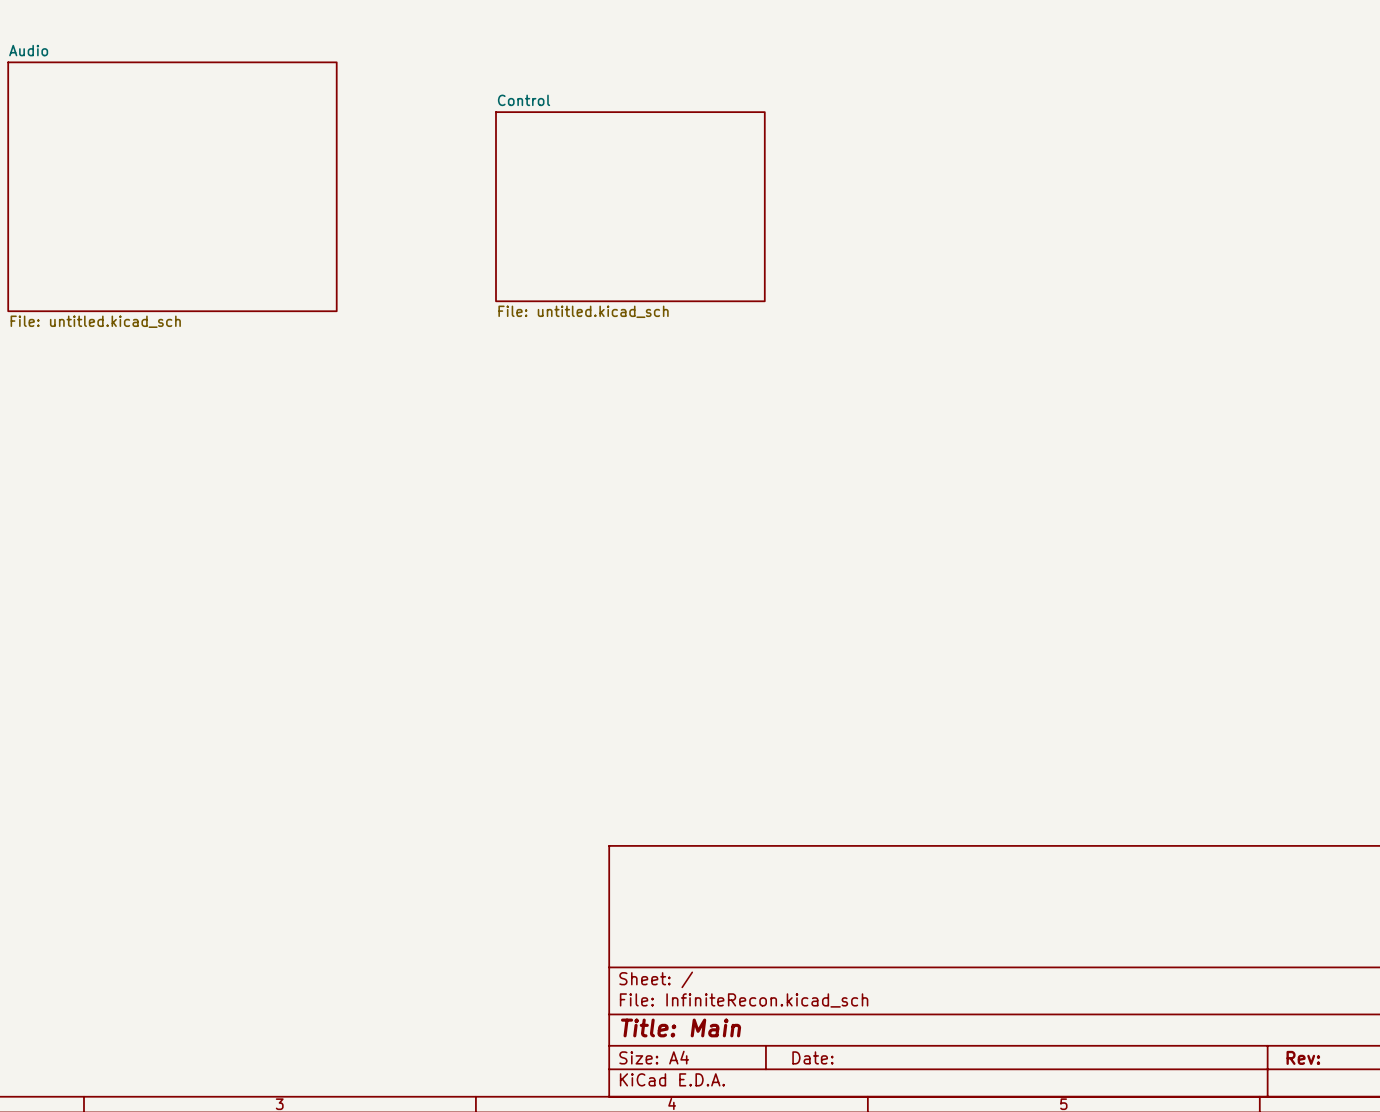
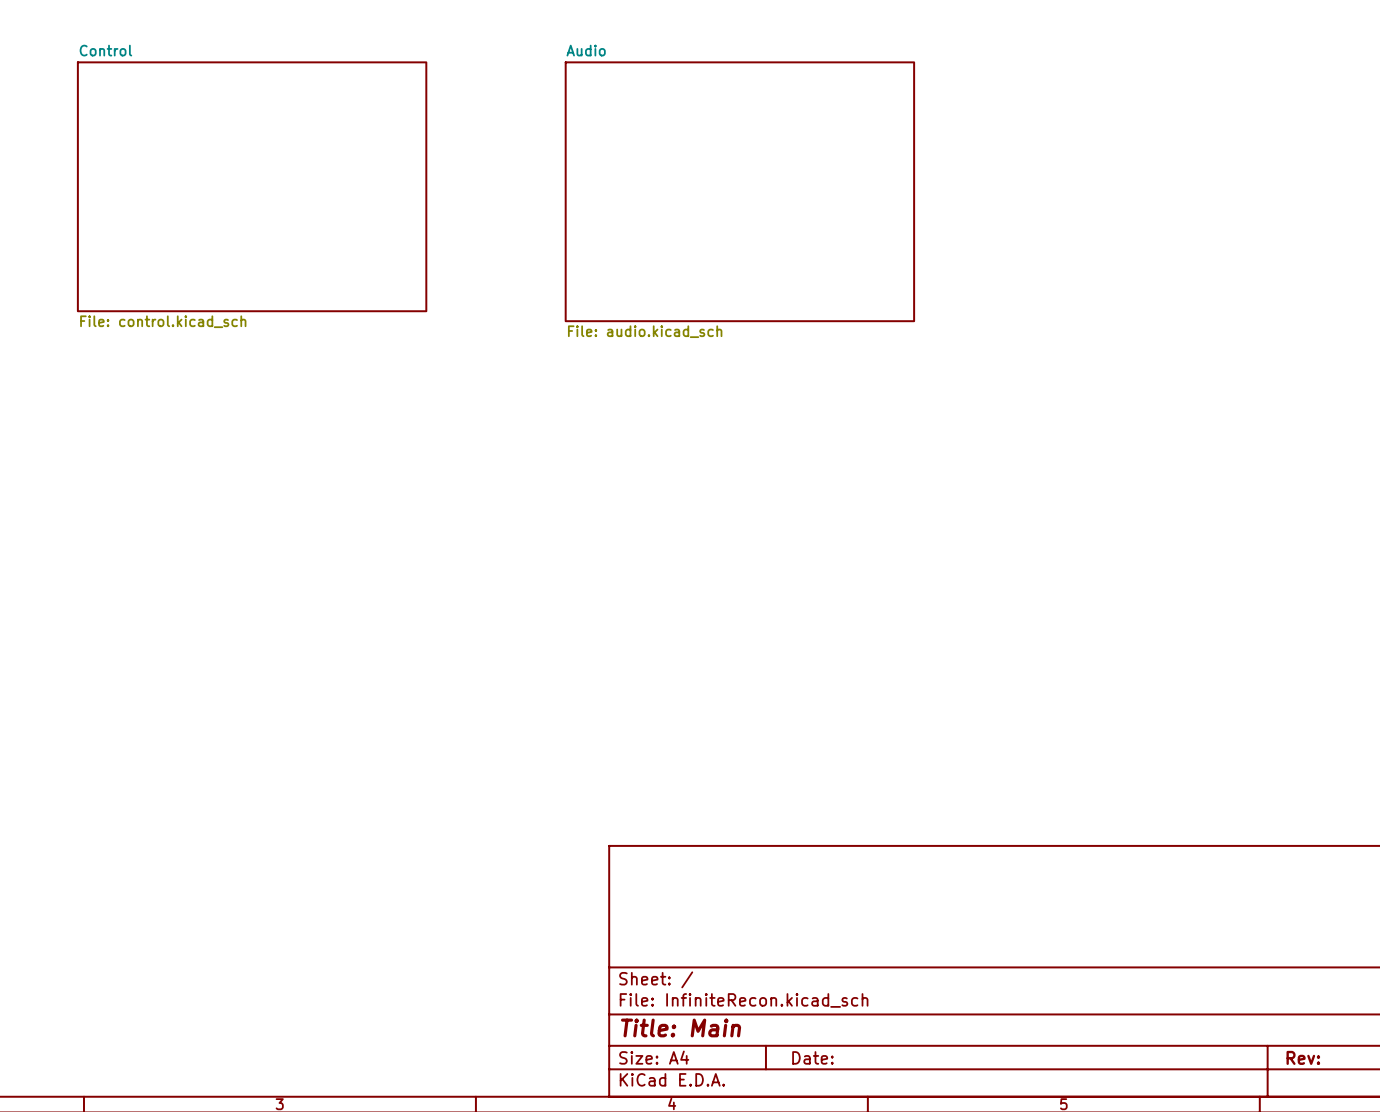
sheet Audio: File: untitled.kicad_sch (172, 186) -> none
sheet Control: none -> File: control.kicad_sch (252, 186)
sheet Audio: none -> File: audio.kicad_sch (739, 191)
sheet Control: File: untitled.kicad_sch (630, 206) -> none

